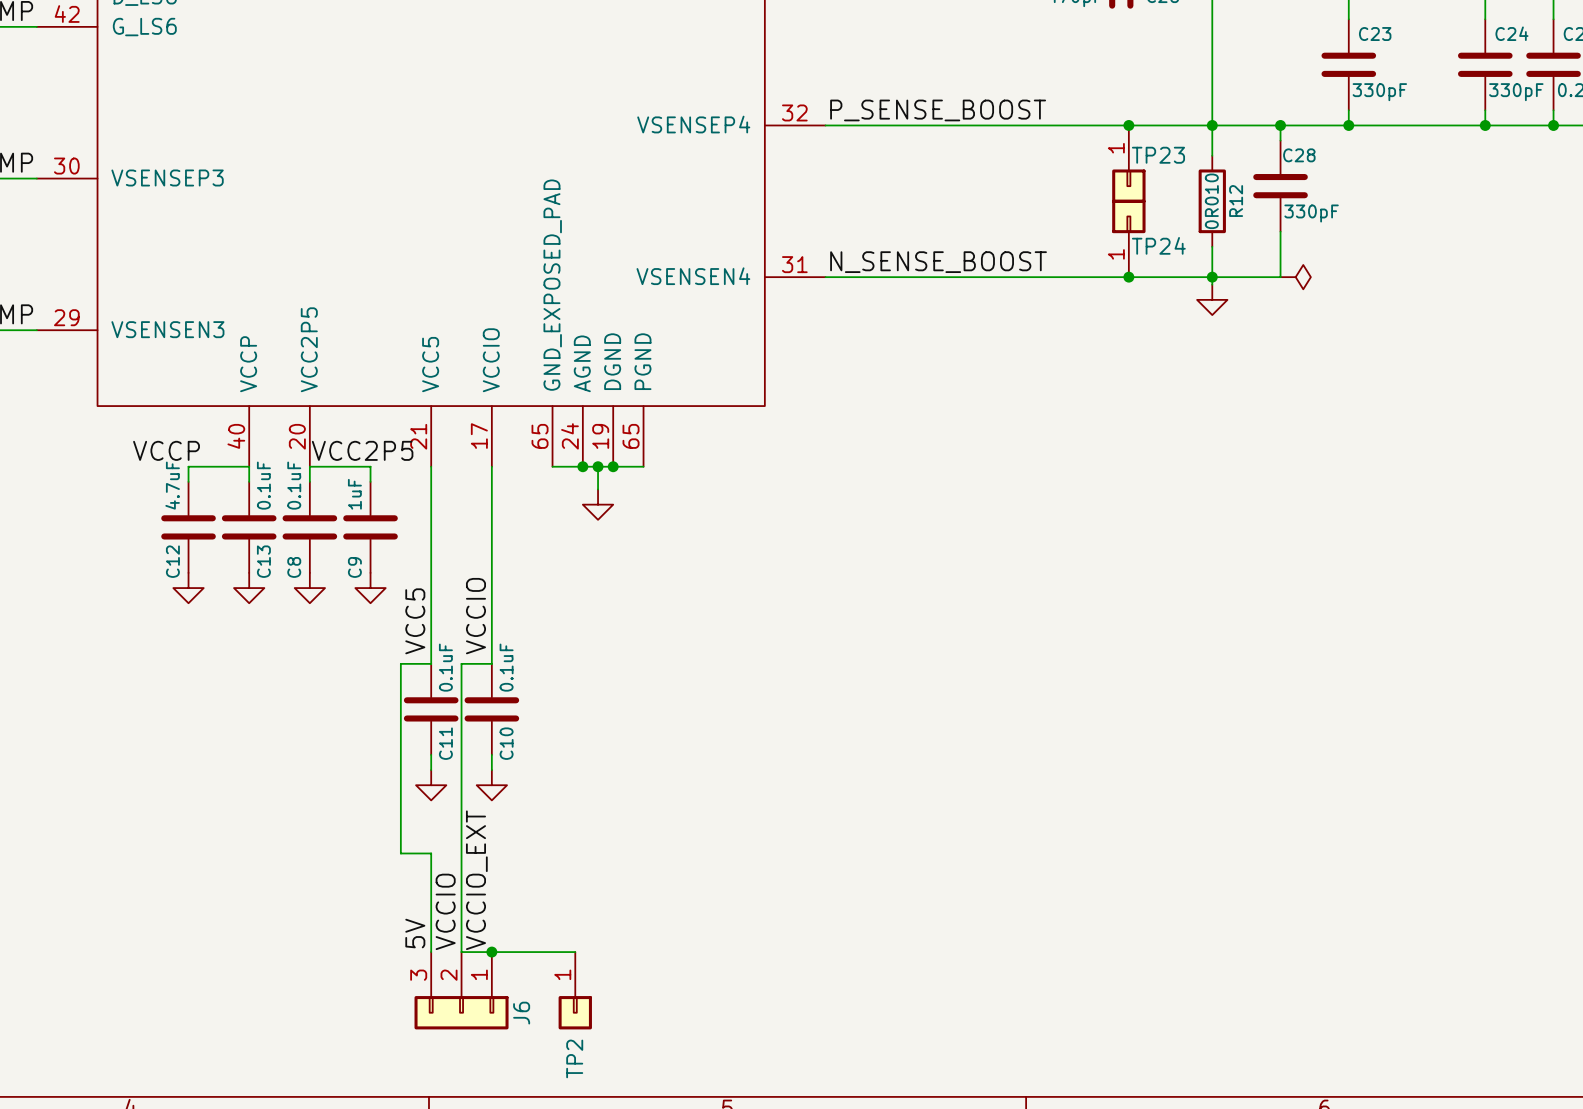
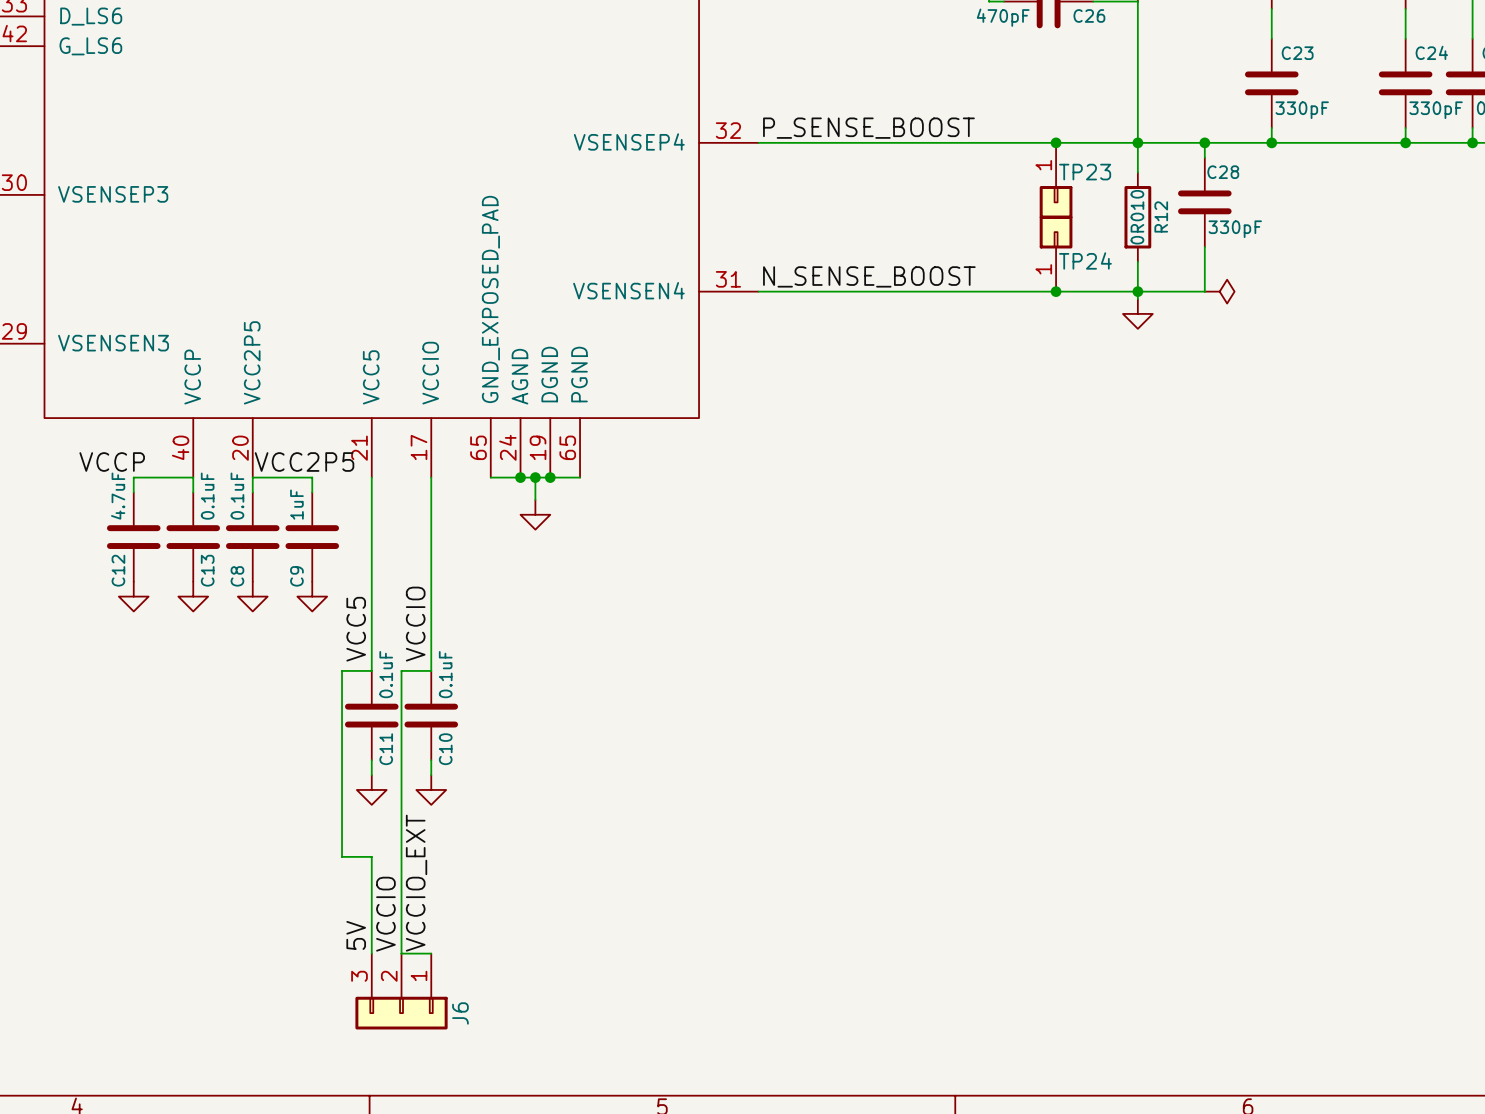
wire: (491, 952) (575, 952) -> none
junction: (491, 952) -> none
TP2: (575, 990) -> none

